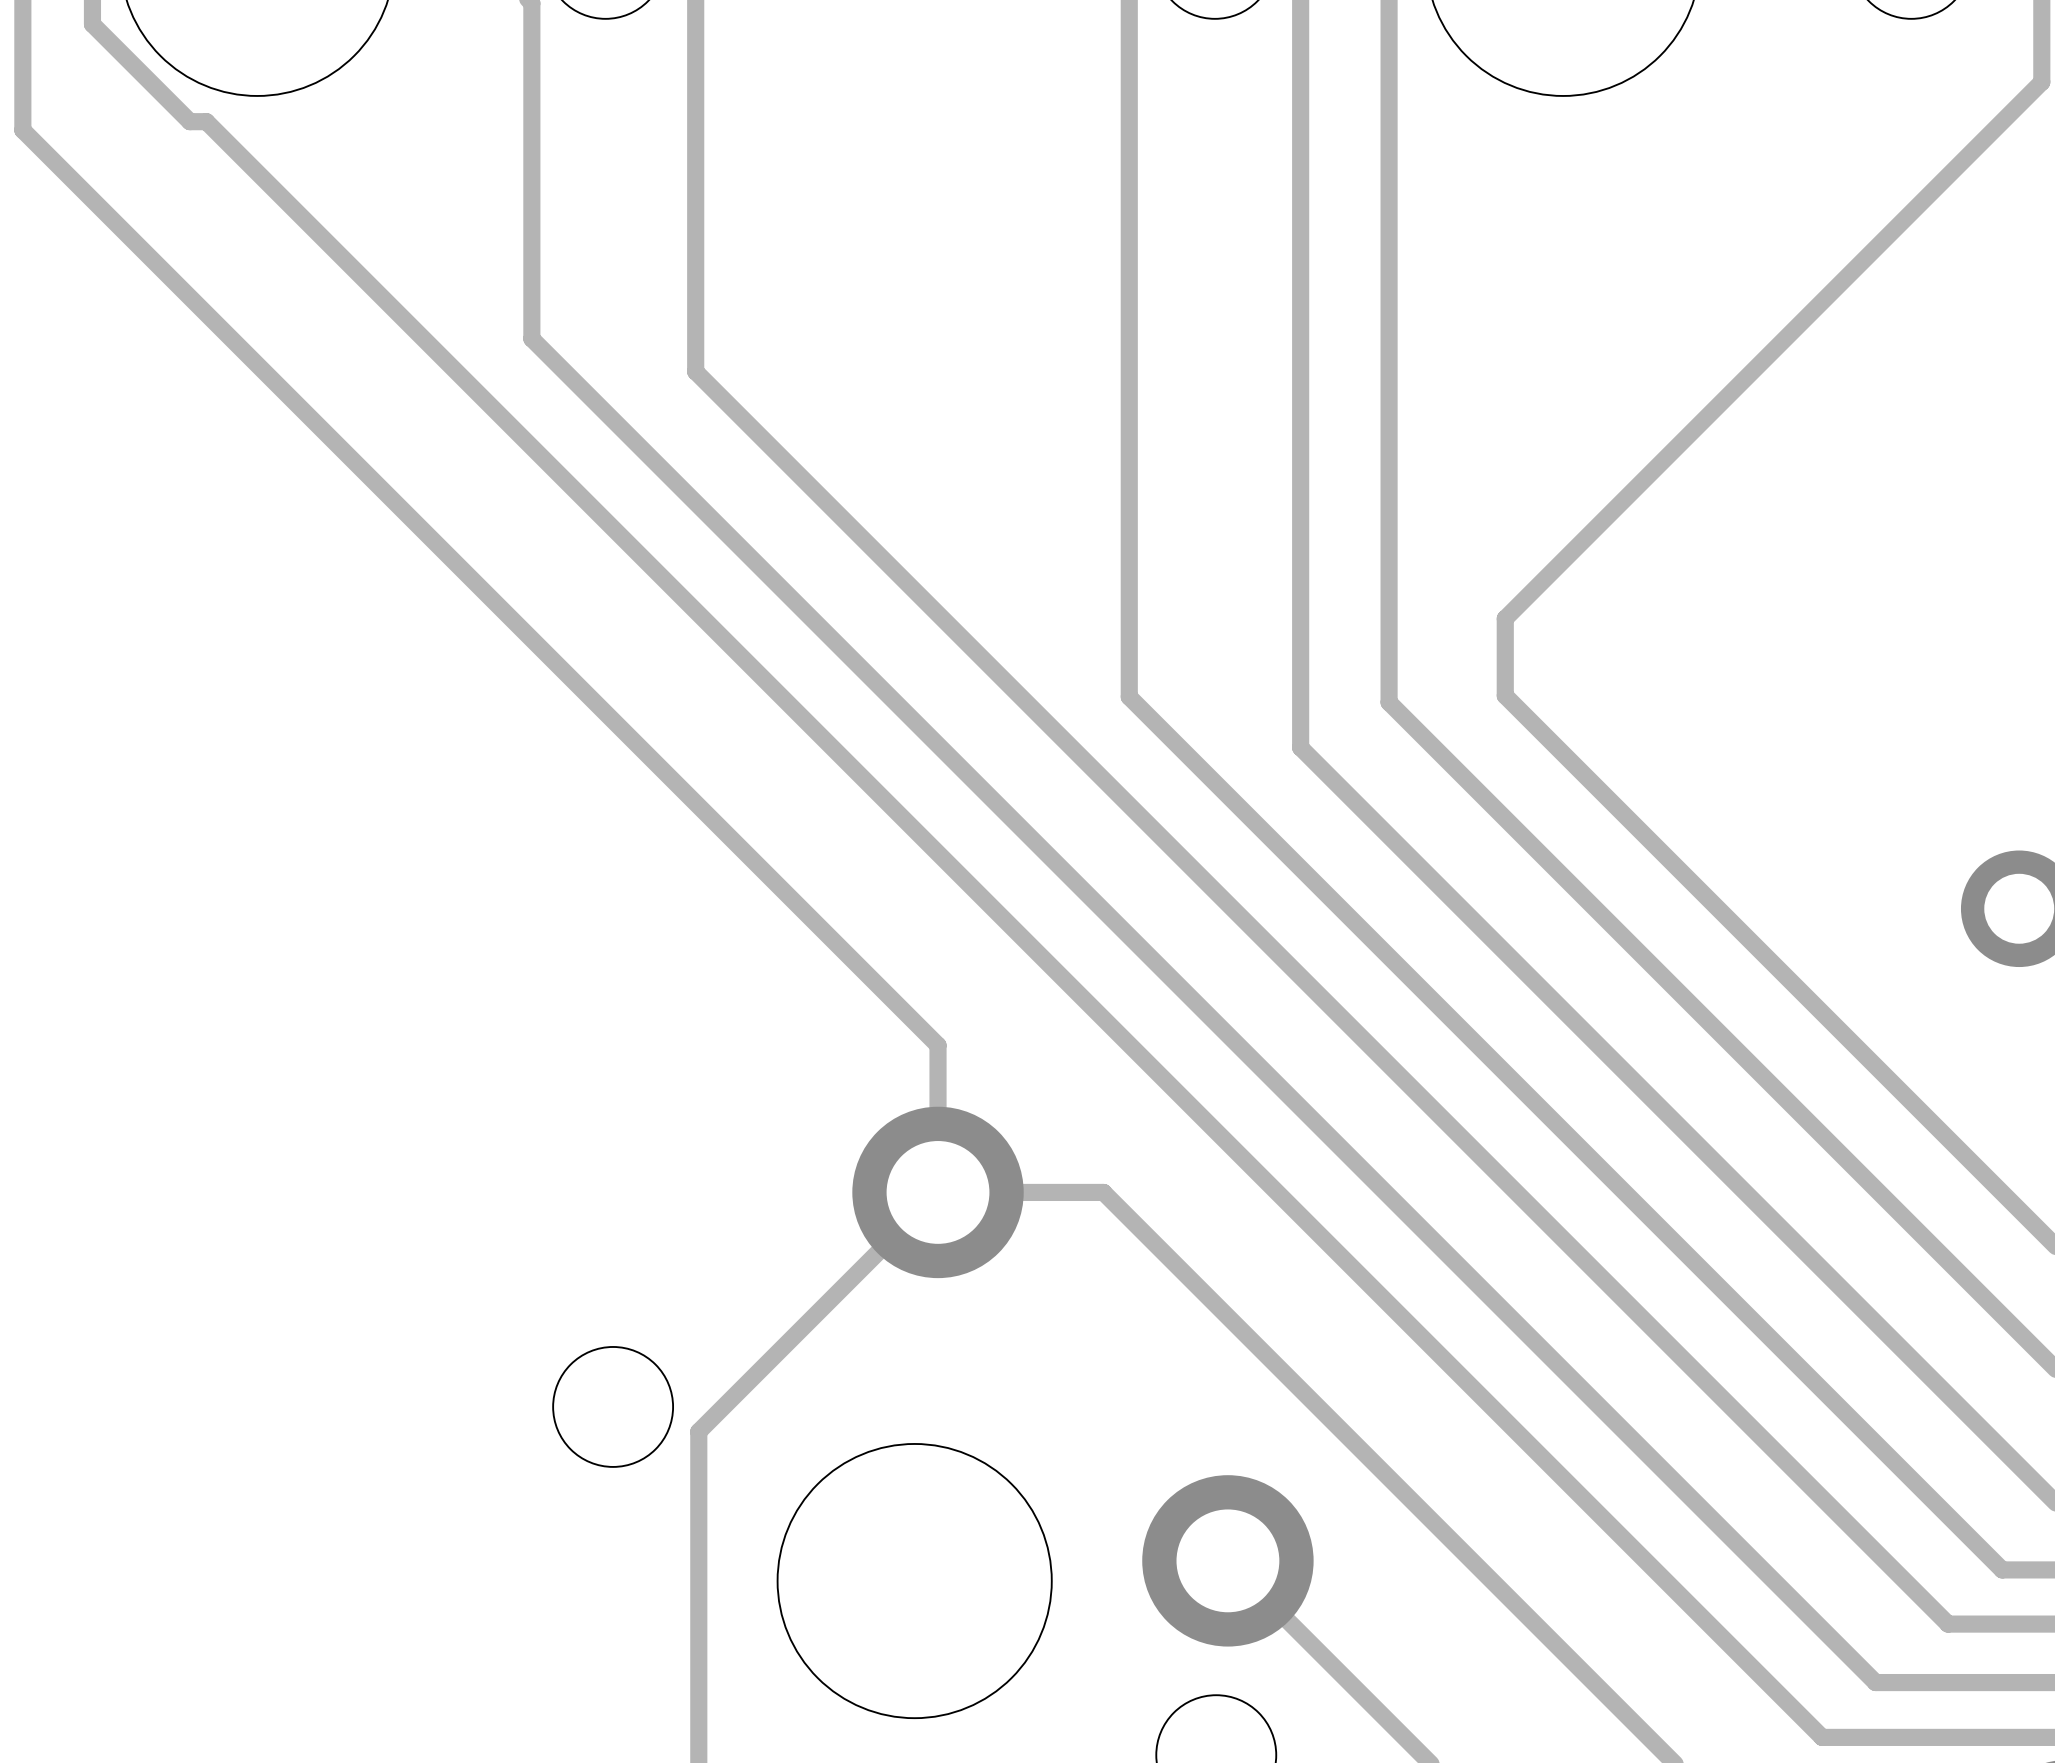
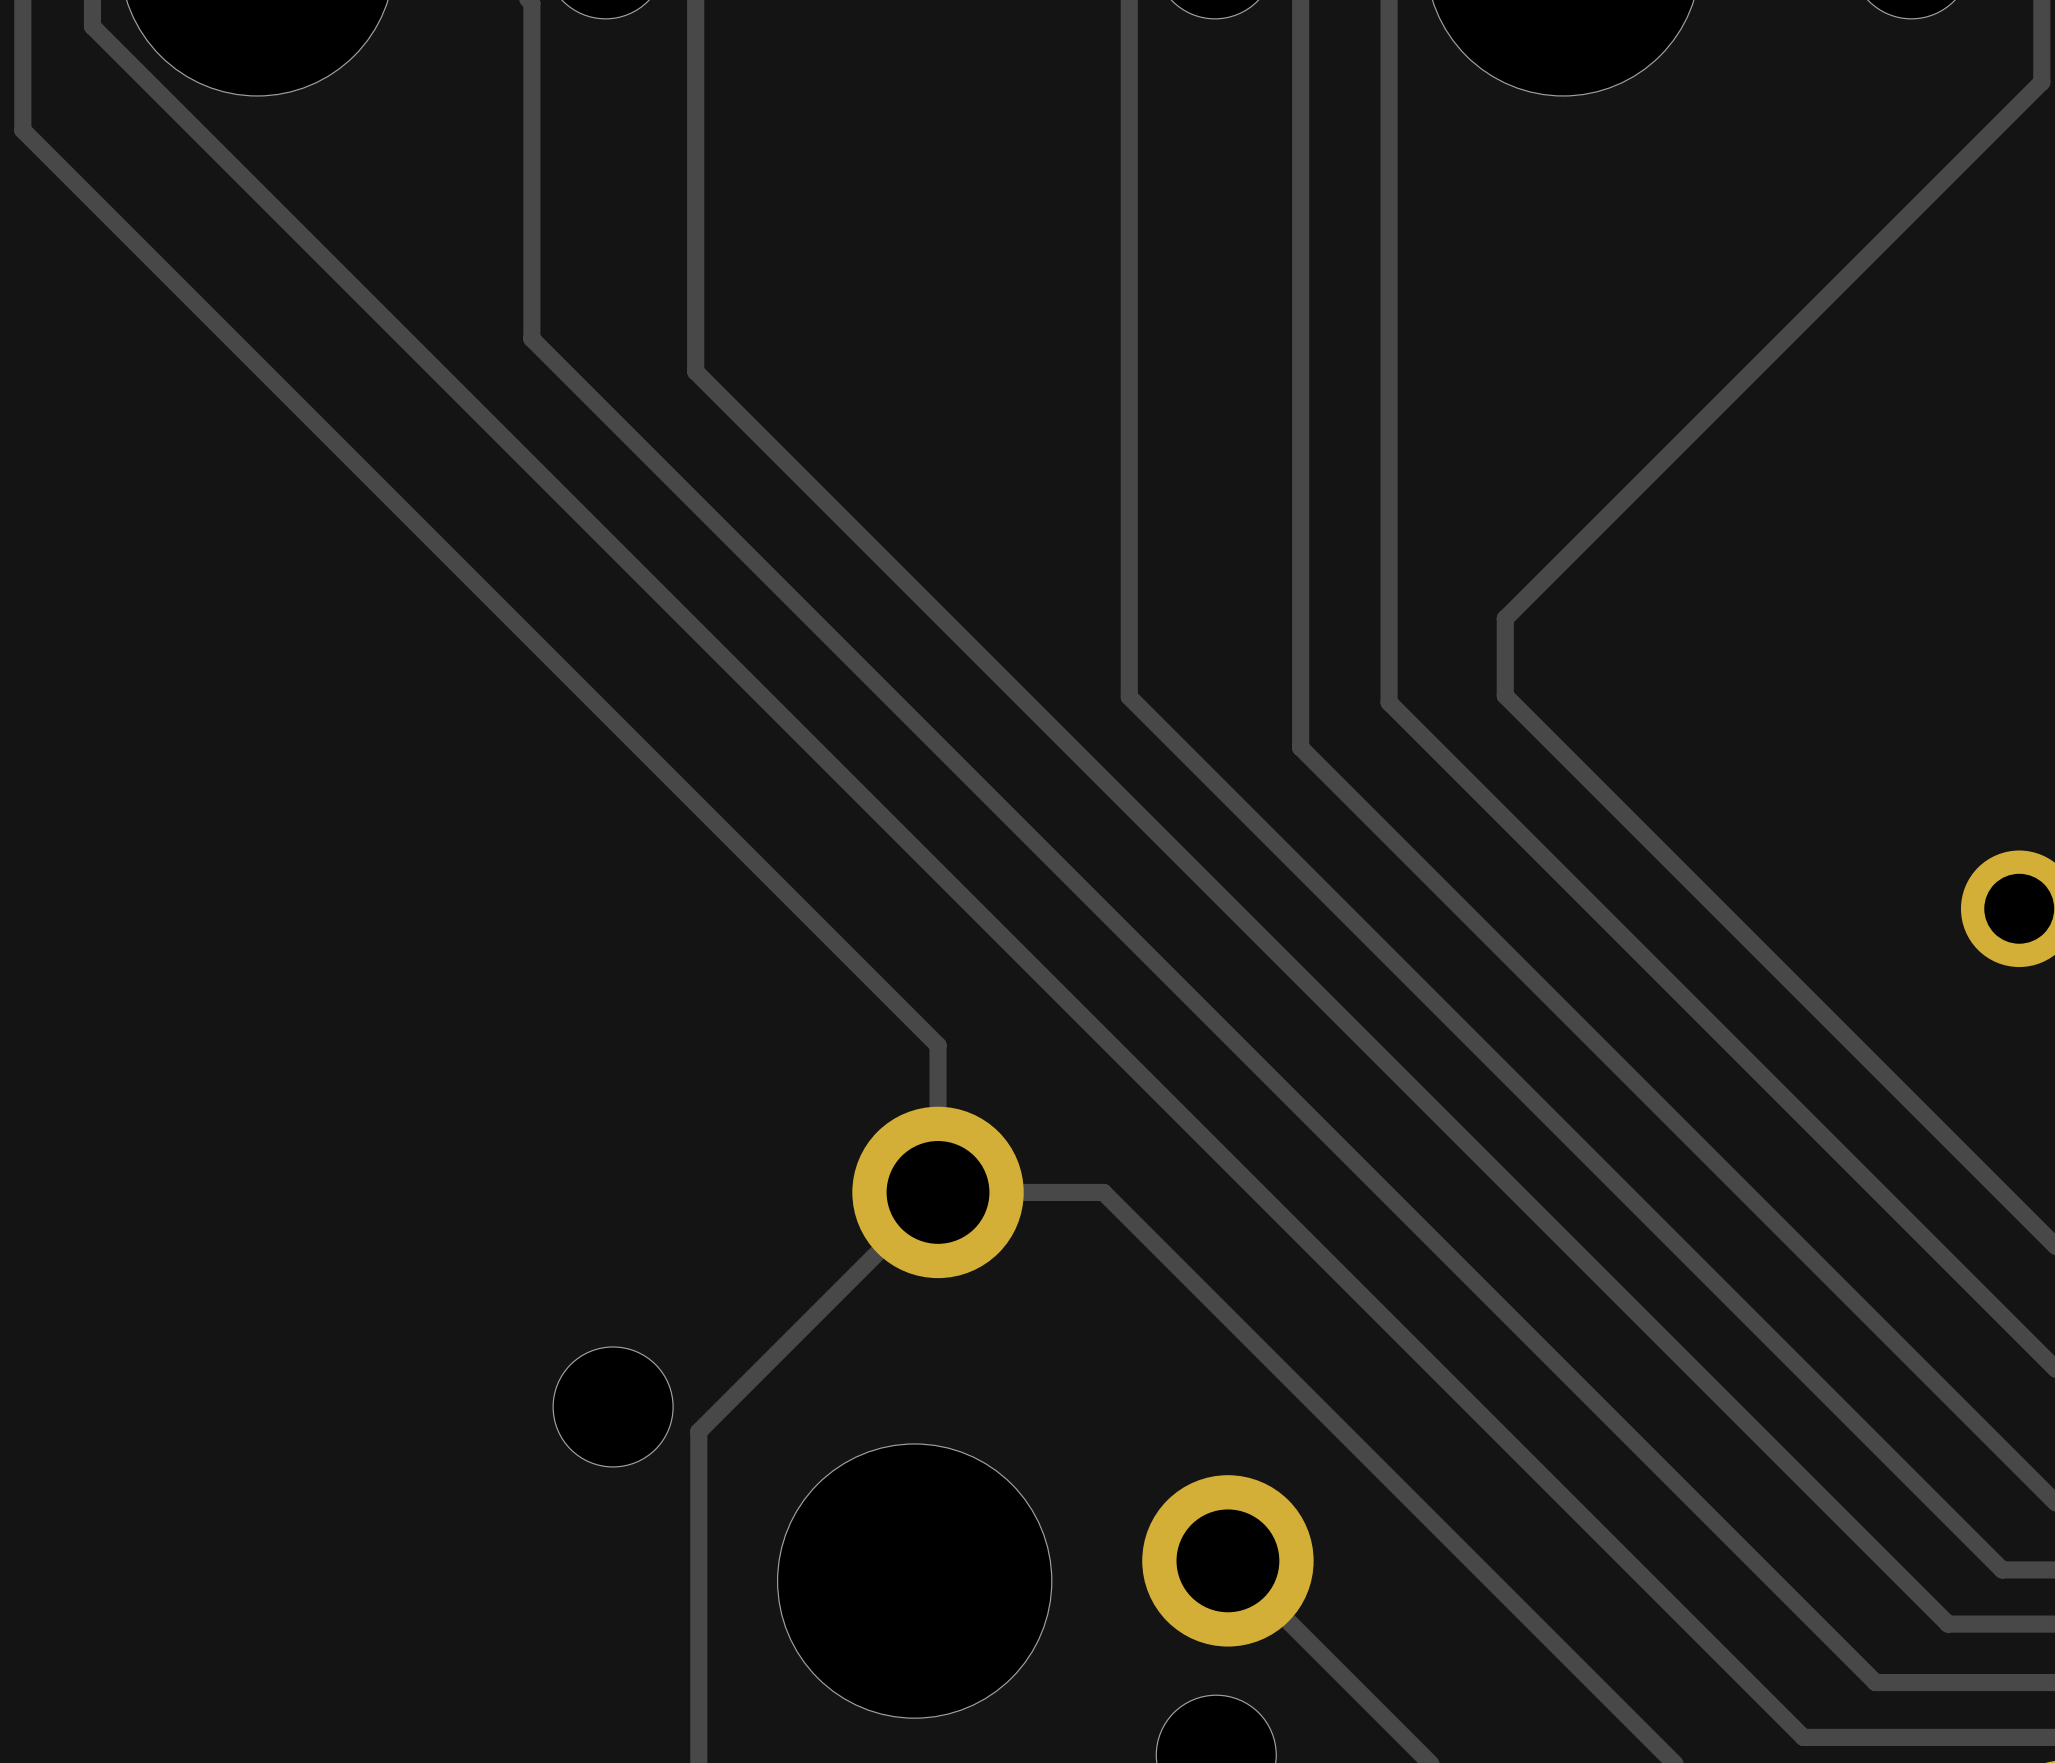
track: (92, 24) (189, 121) (206, 121) (1822, 1737) -> (92, 24) (92, 26) (1803, 1737) (1822, 1737)

